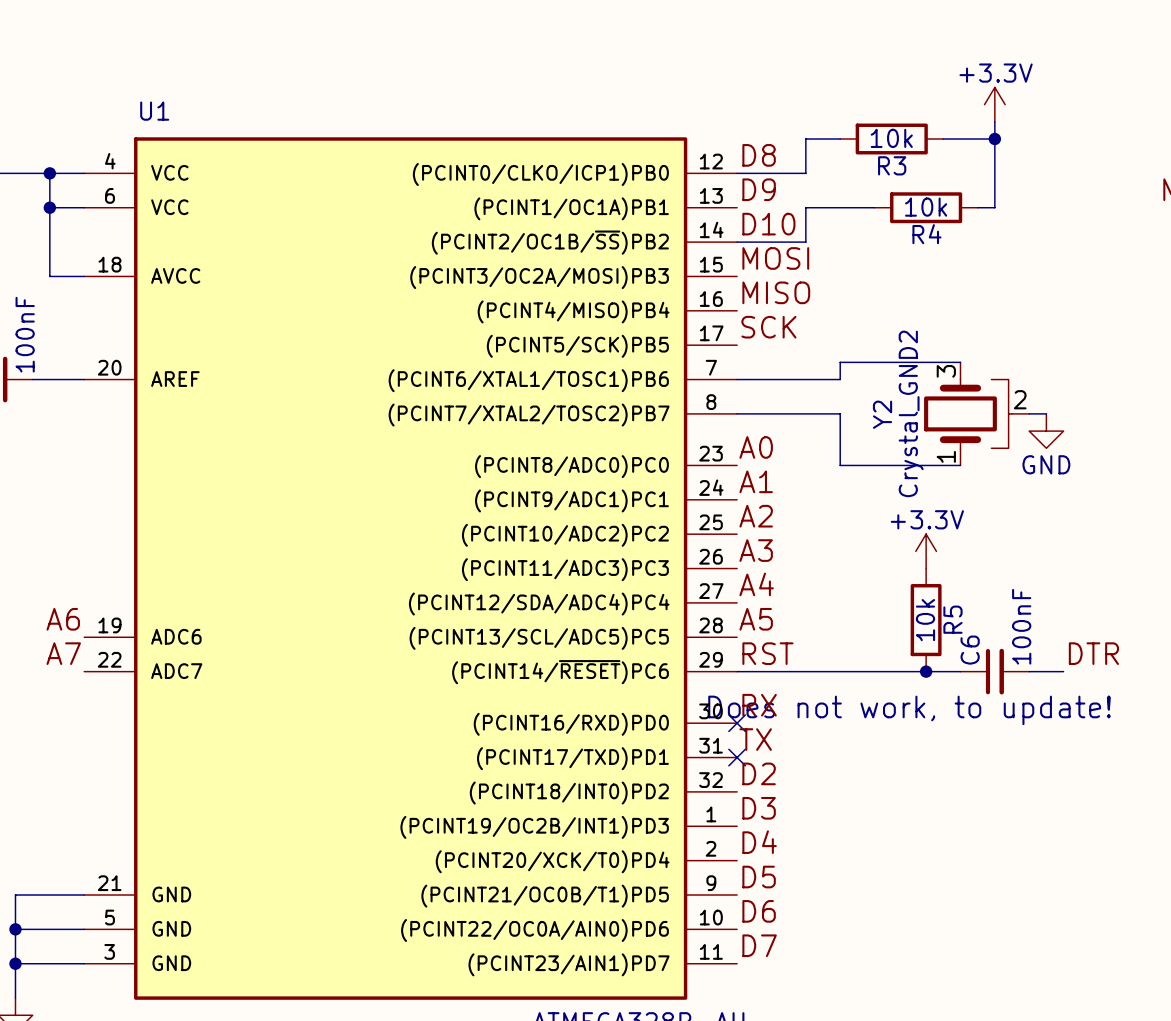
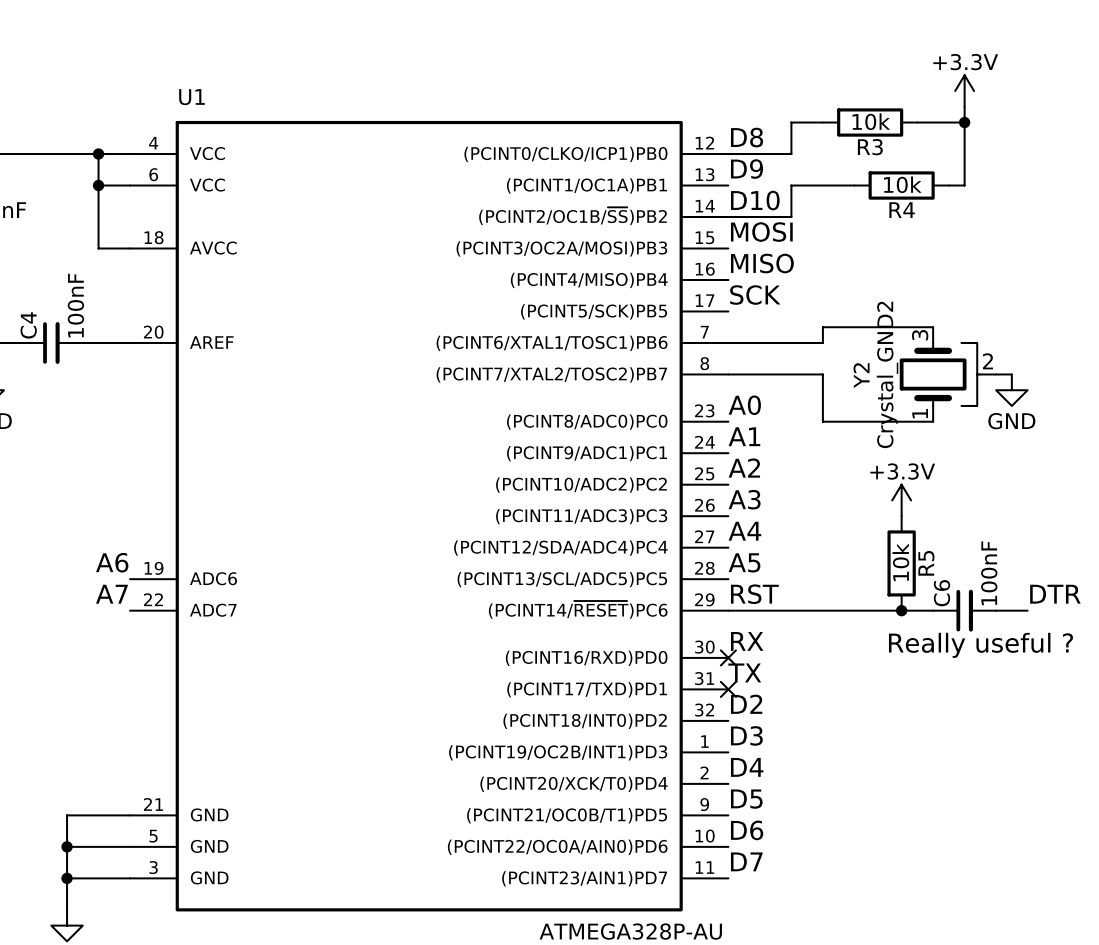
text: Does not work, to update! (909, 710) -> Really useful ? (981, 645)

